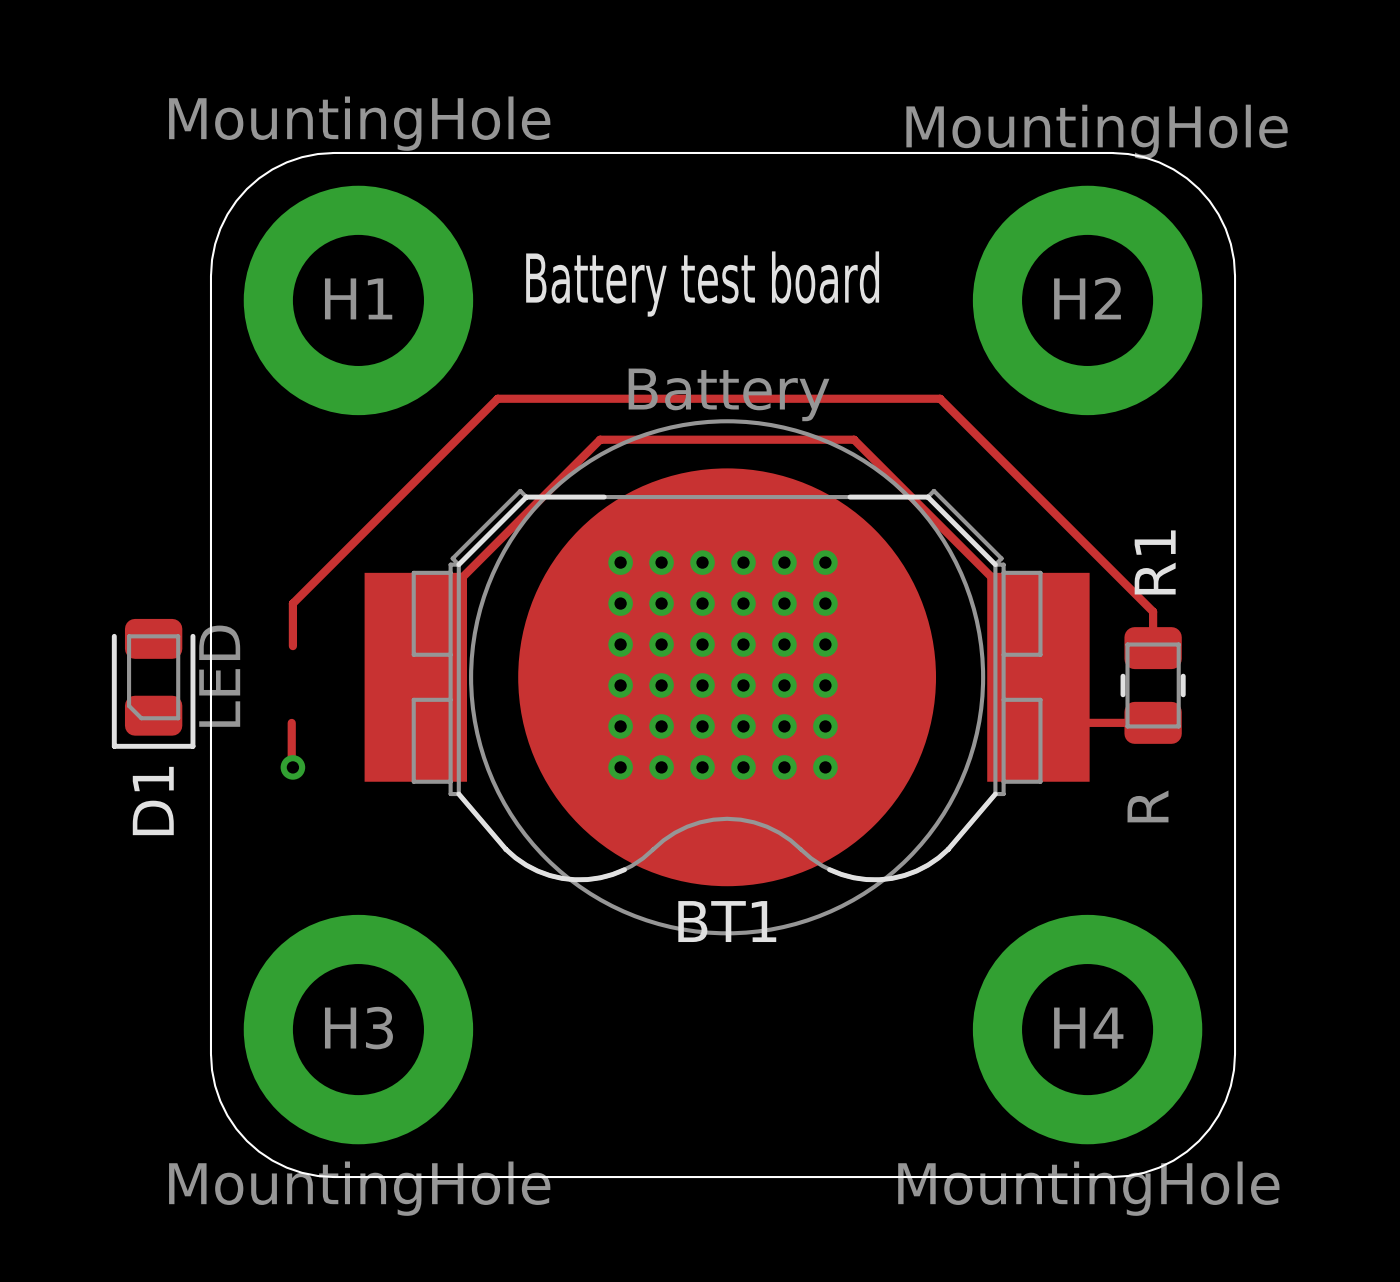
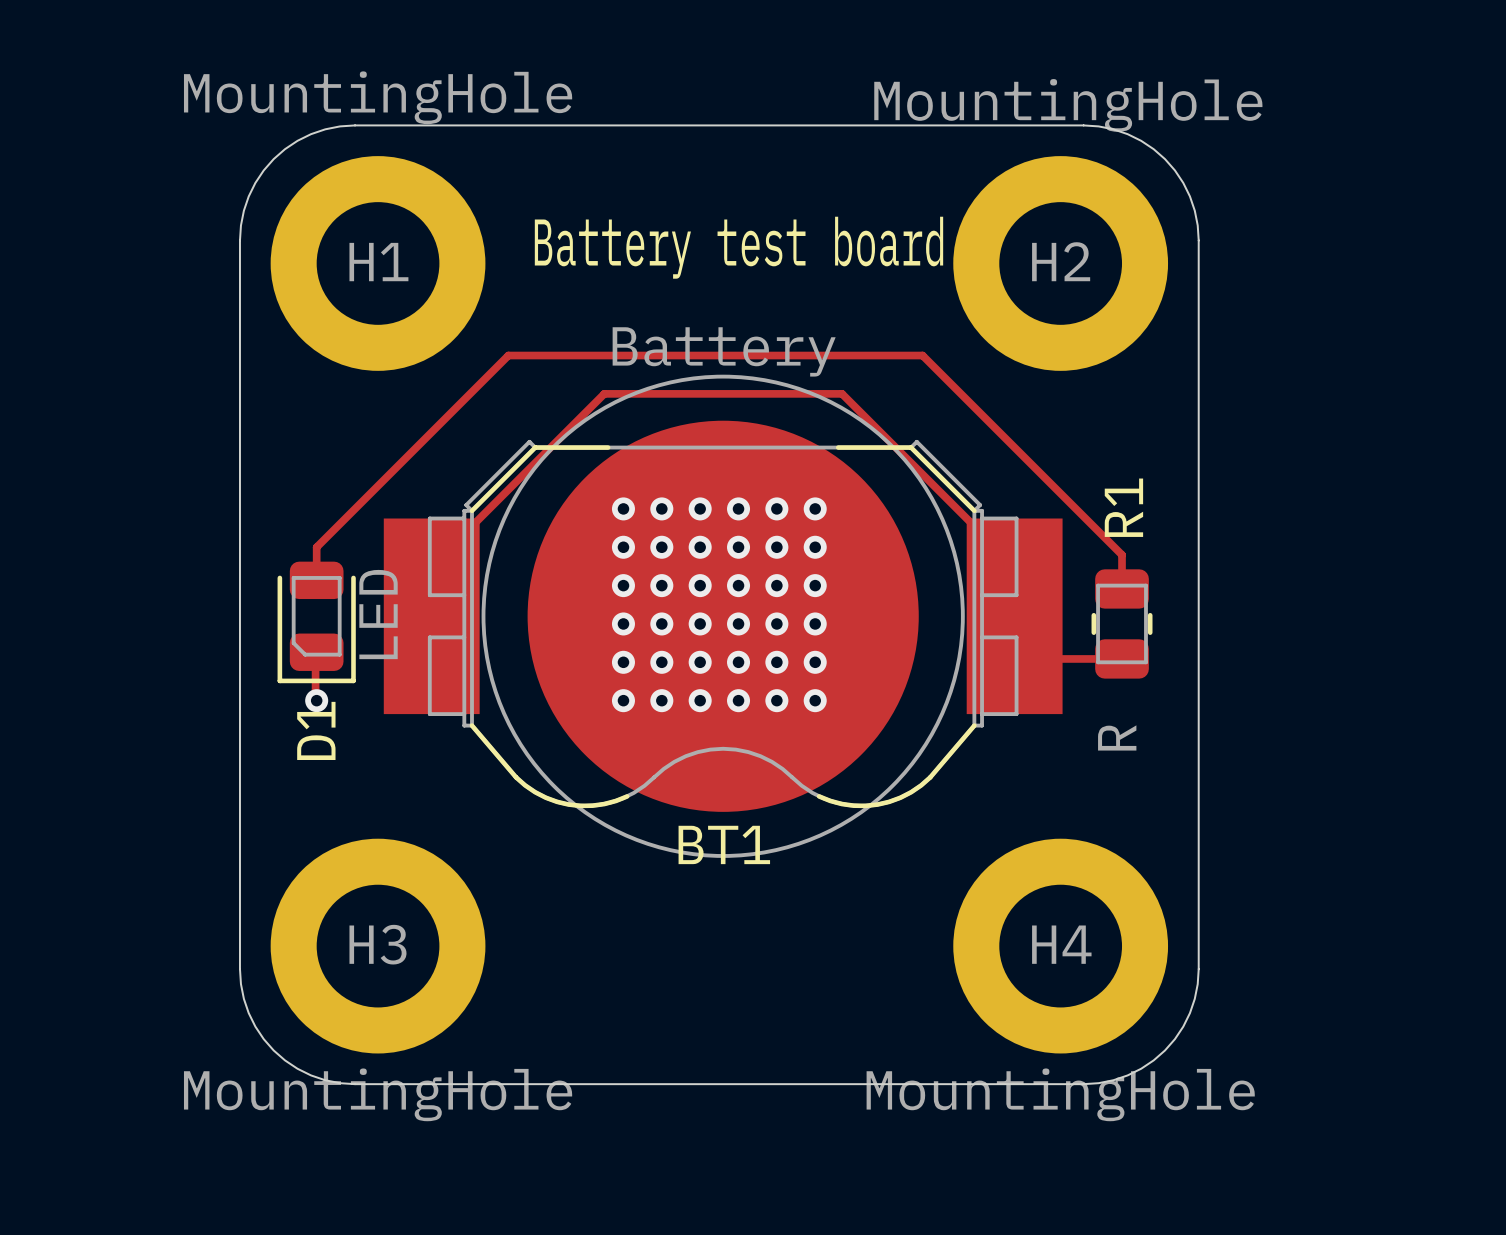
D1 position: (153, 683) -> (316, 622)

